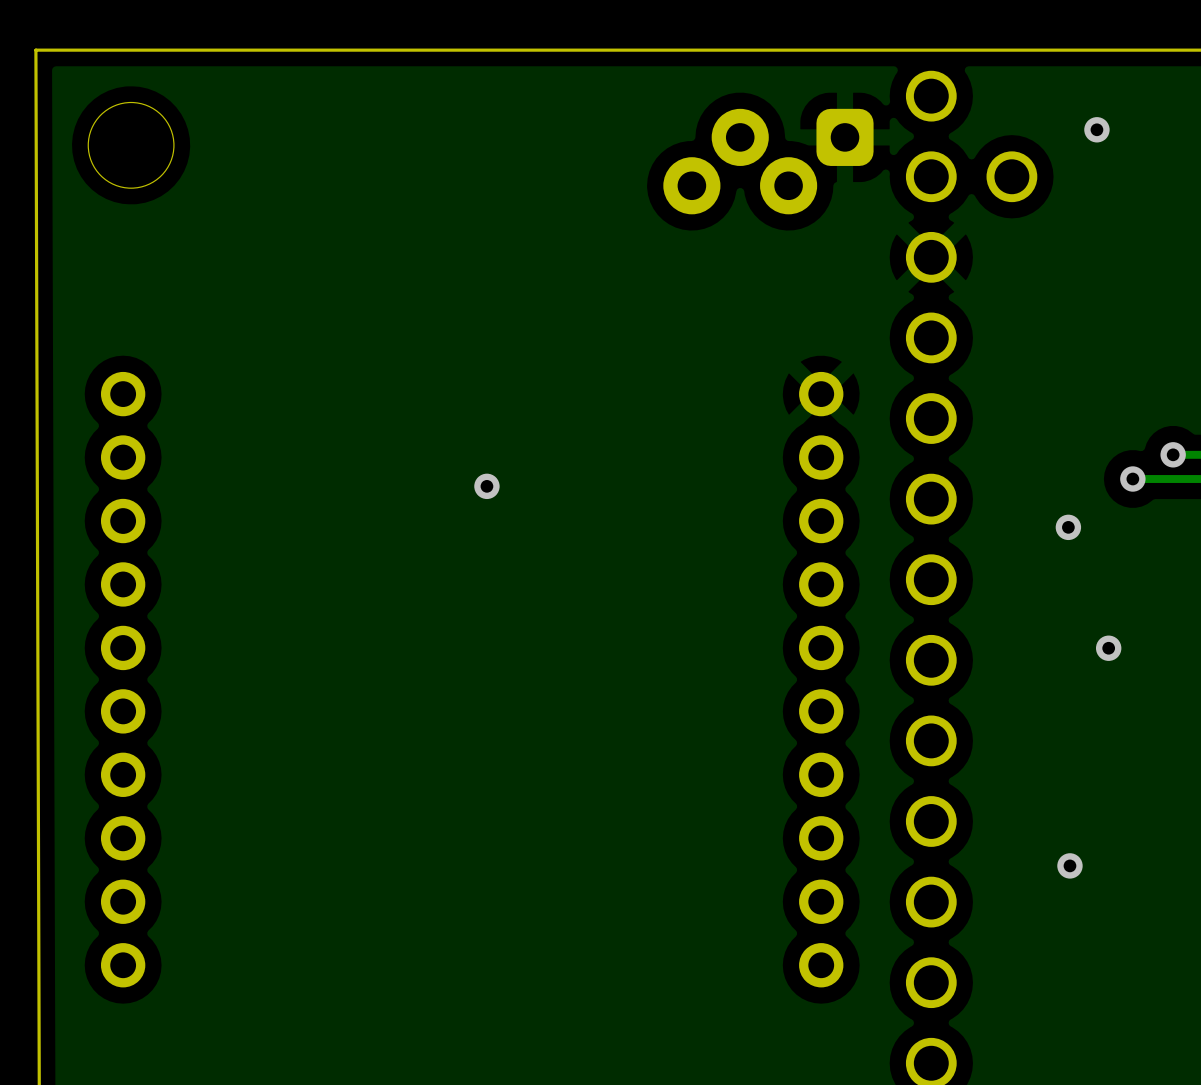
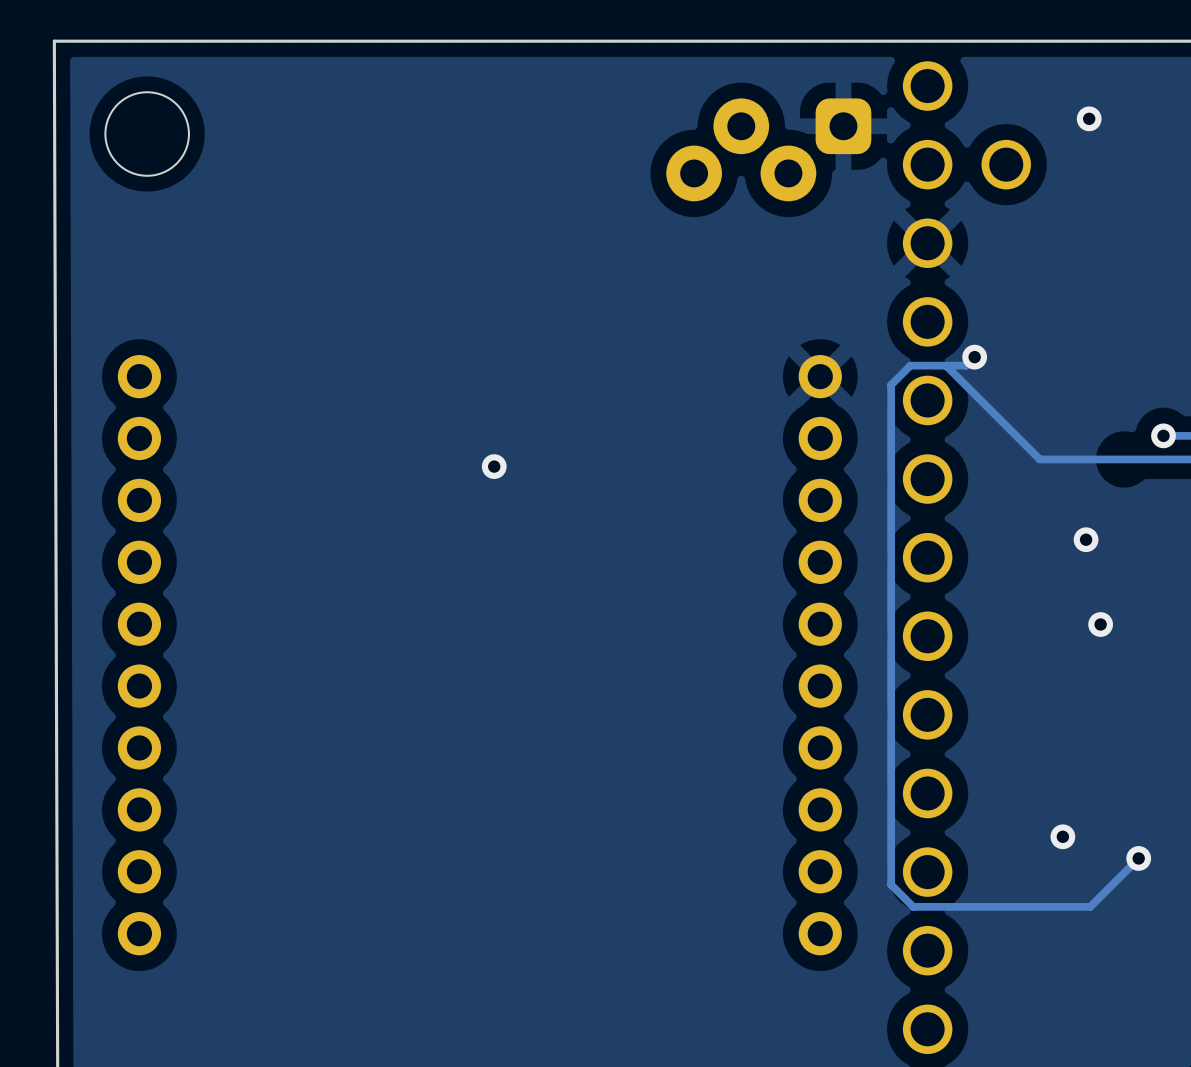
track: none -> (974, 357) (966, 365) (910, 365) (891, 384) (891, 884) (913, 906) (1090, 906) (1138, 858)
via: none -> (974, 357)
track: none -> (946, 365) (1039, 459) (1124, 459)
via: (1132, 479) -> none
via position: (1068, 527) -> (1086, 539)
via: none -> (1138, 858)

